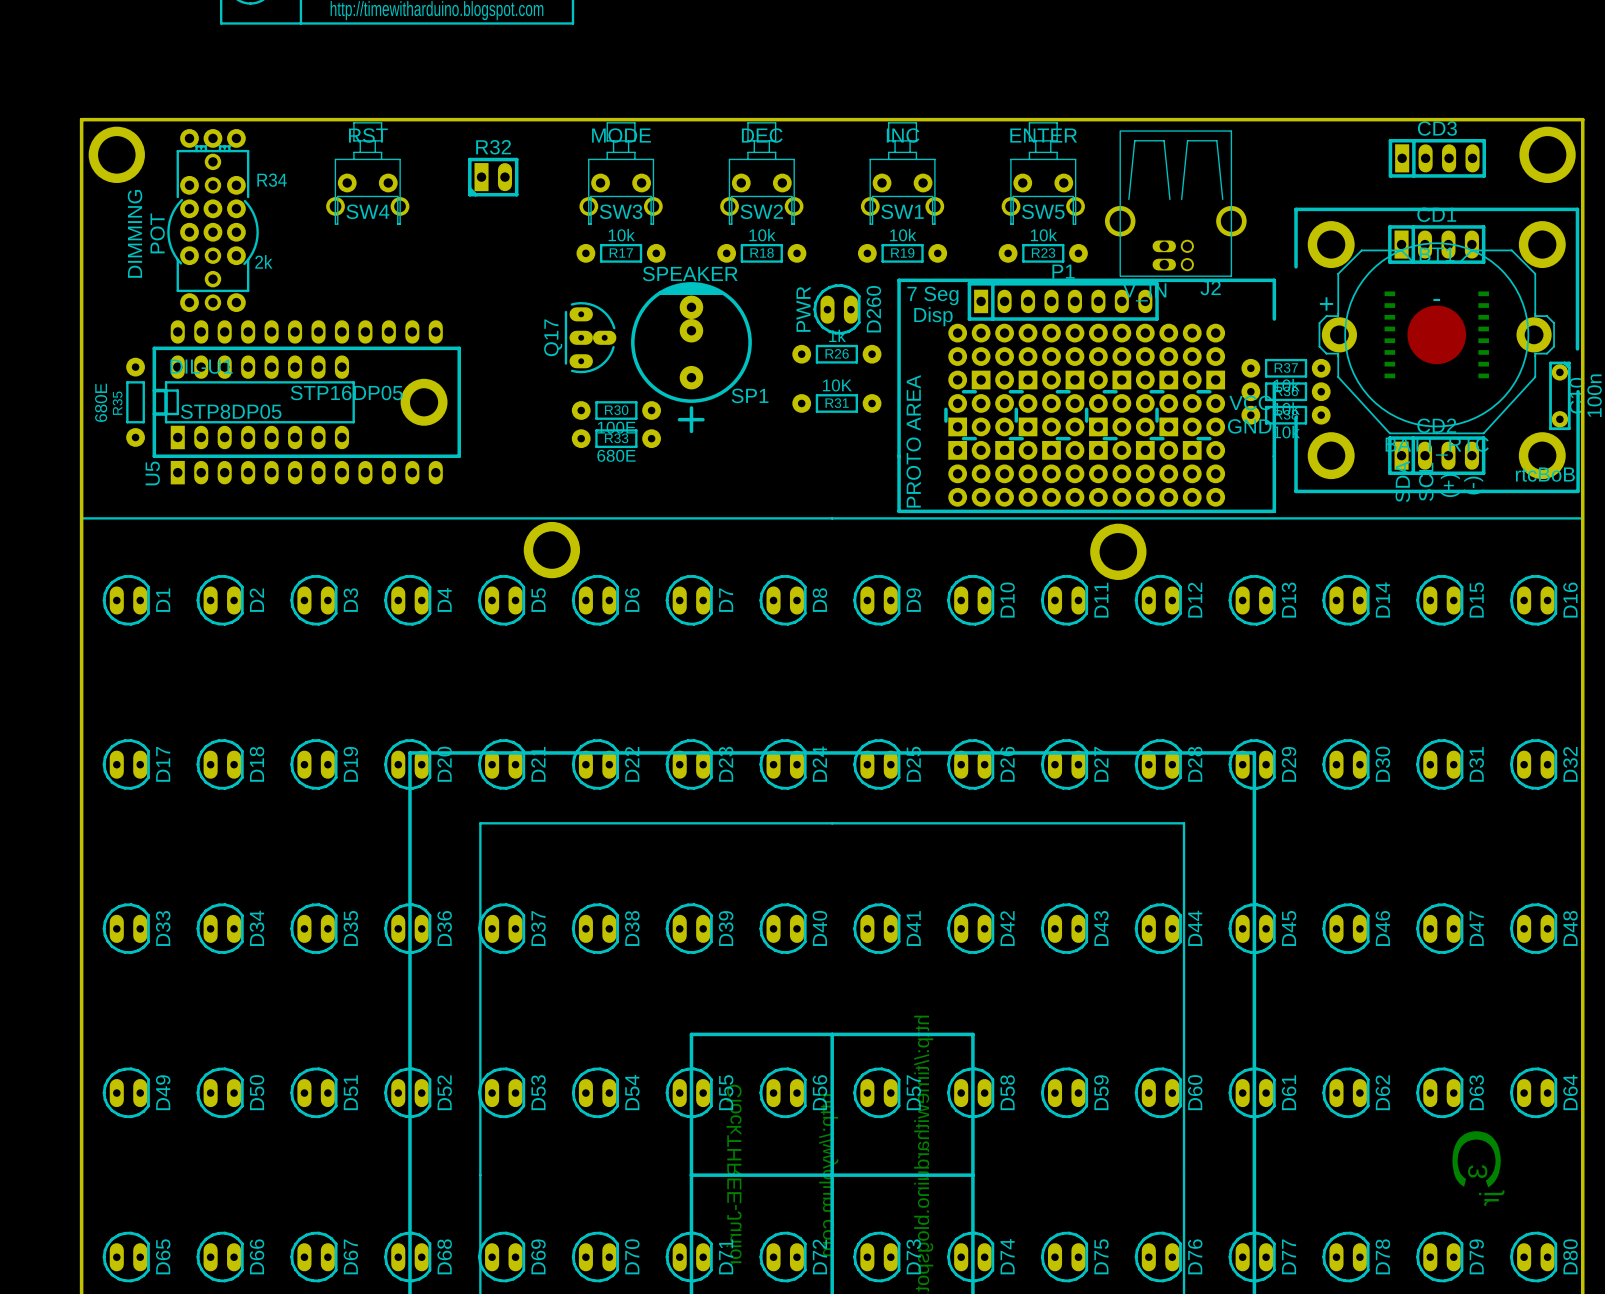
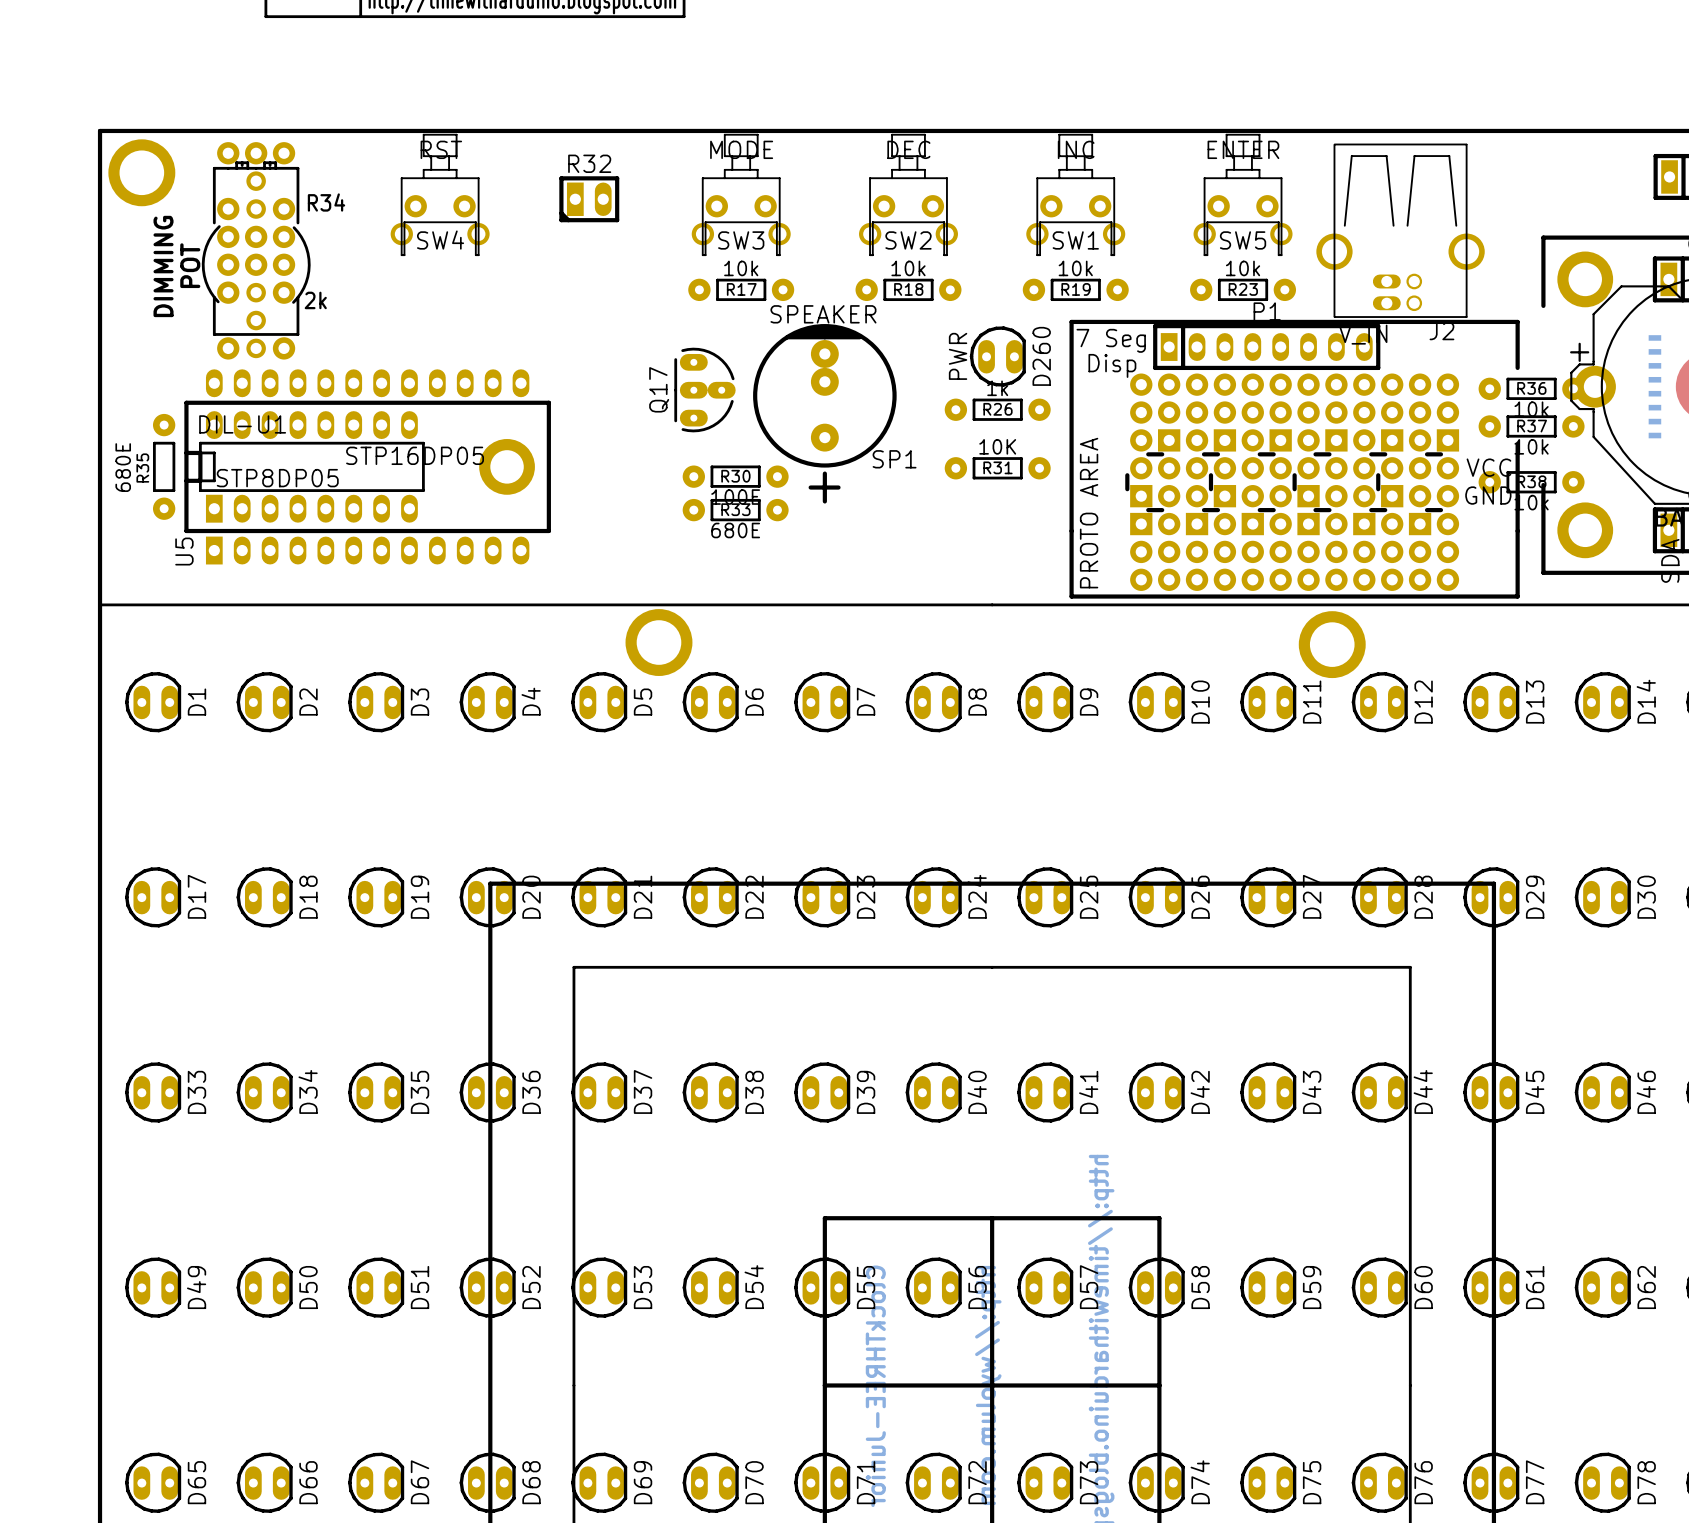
R36 position: (1286, 391) -> (1531, 388)

